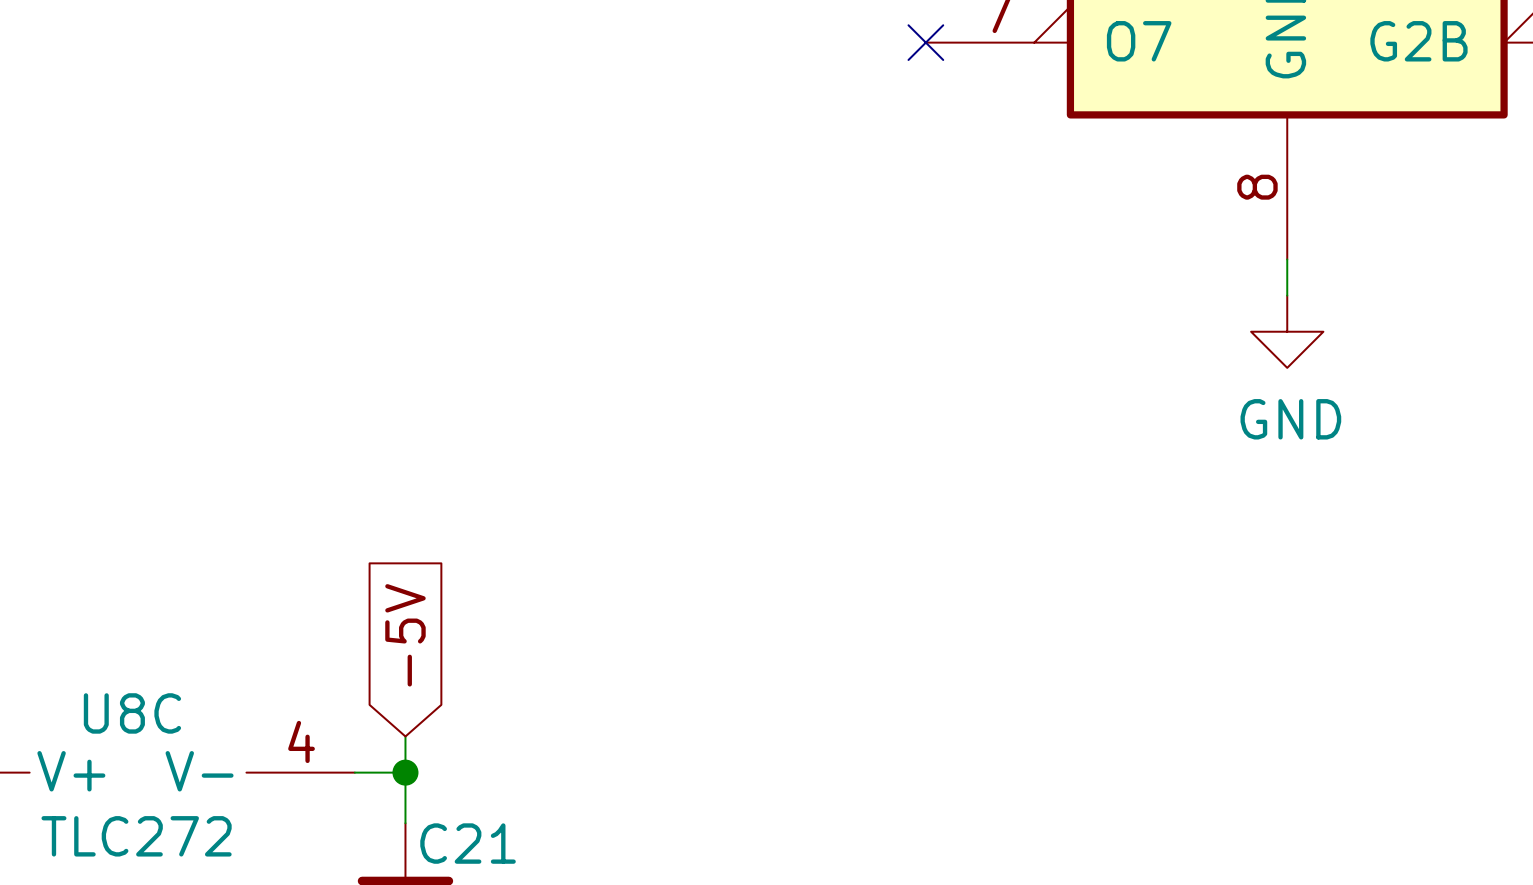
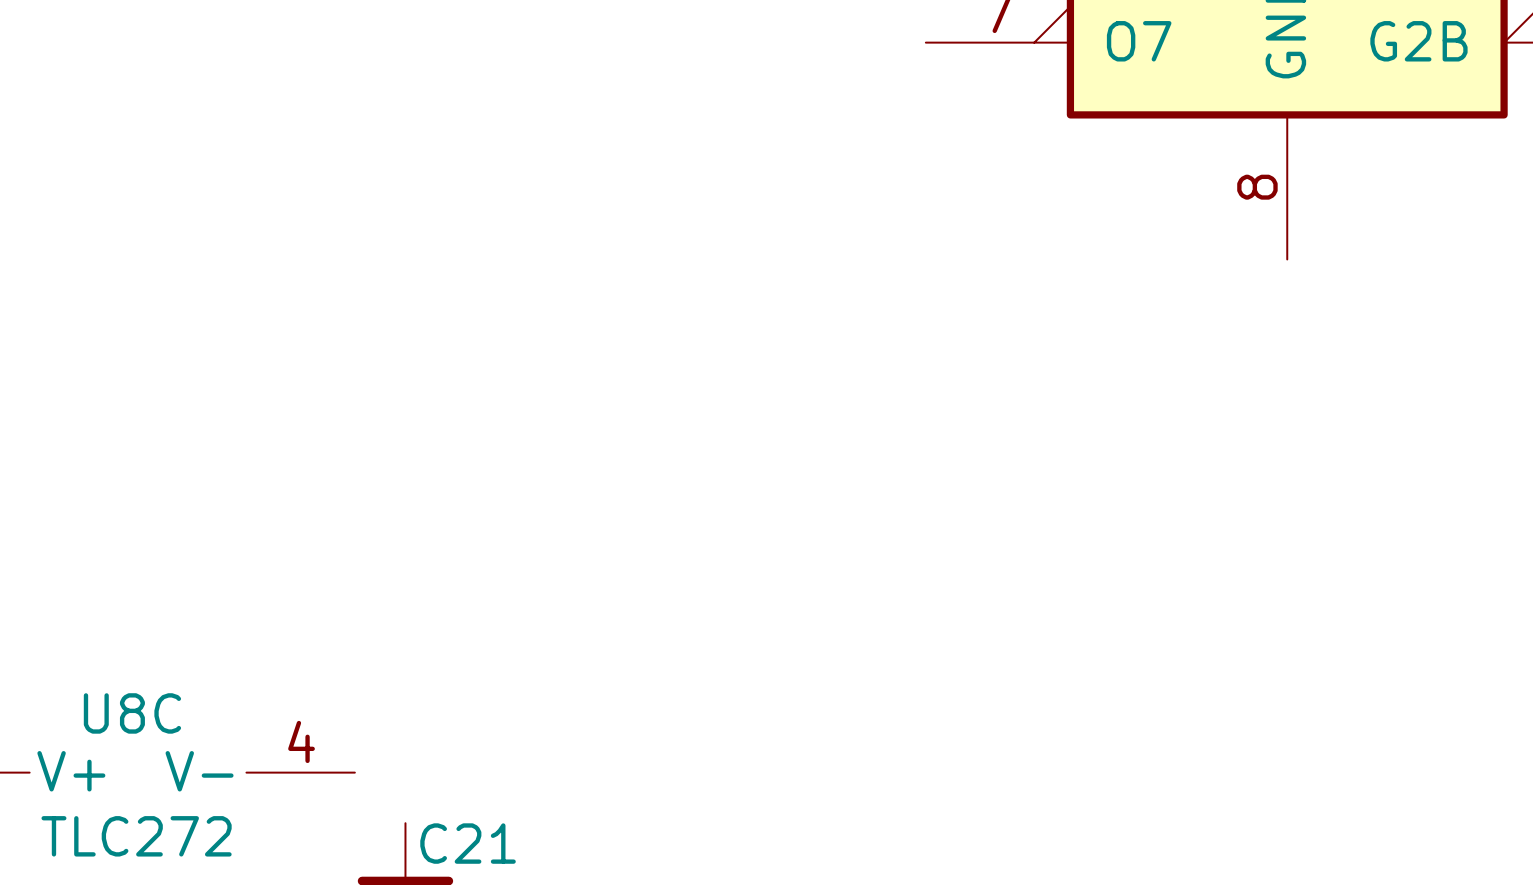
no-connect mark: (925, 42) -> none
wire: (1287, 259) (1287, 295) -> none
power symbol: GND (1287, 331) -> none
global label: -5V (405, 635) -> none
wire: (405, 736) (405, 823) -> none
wire: (354, 772) (405, 772) -> none
junction: (405, 772) -> none

